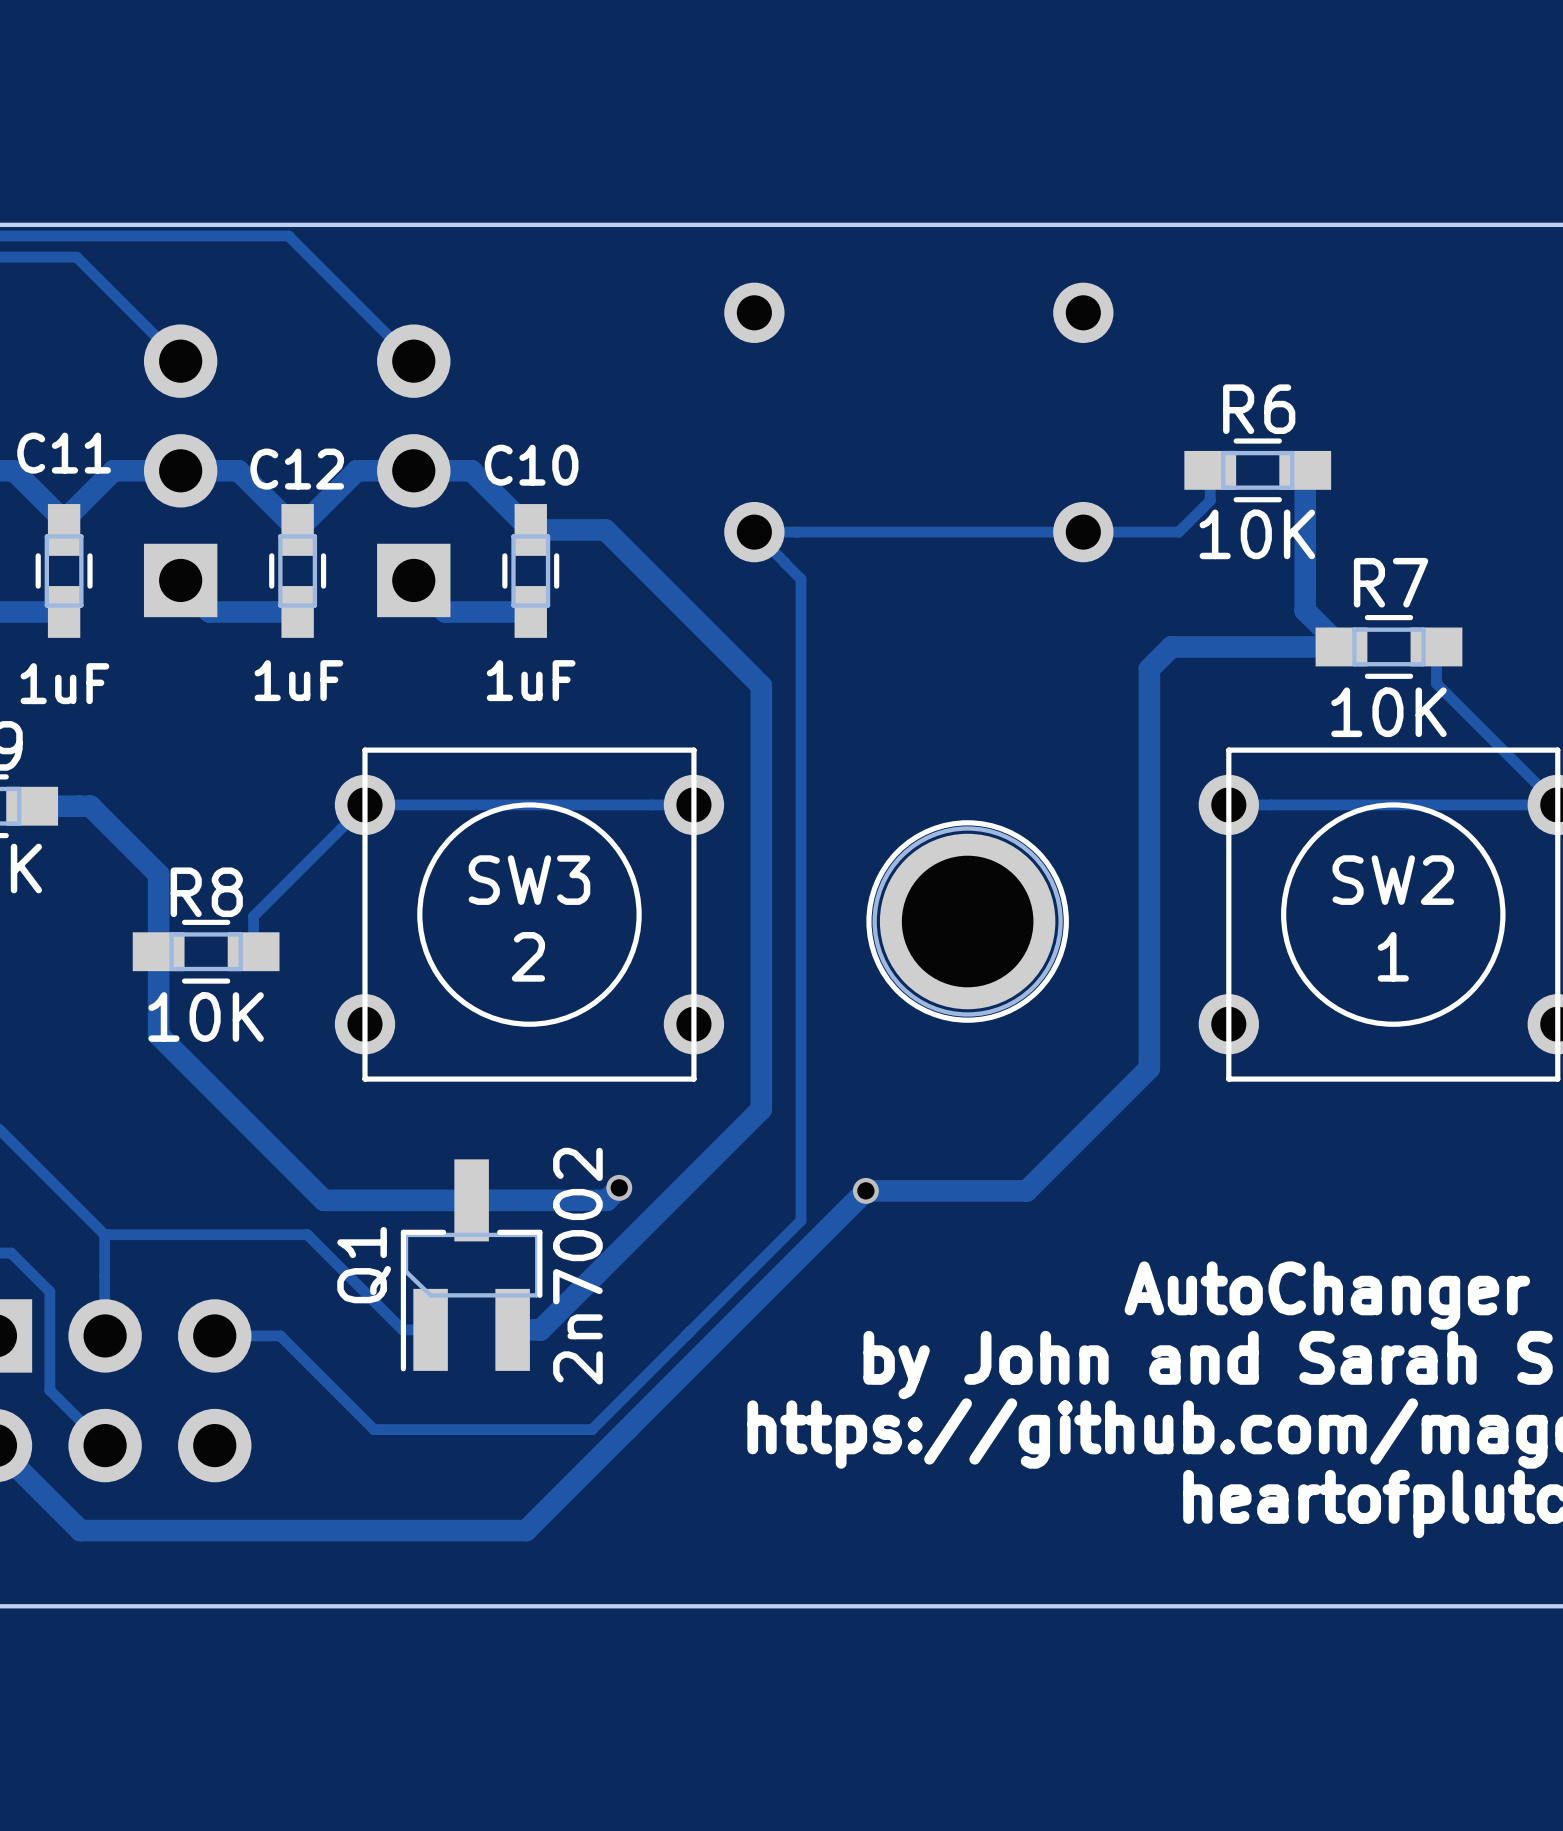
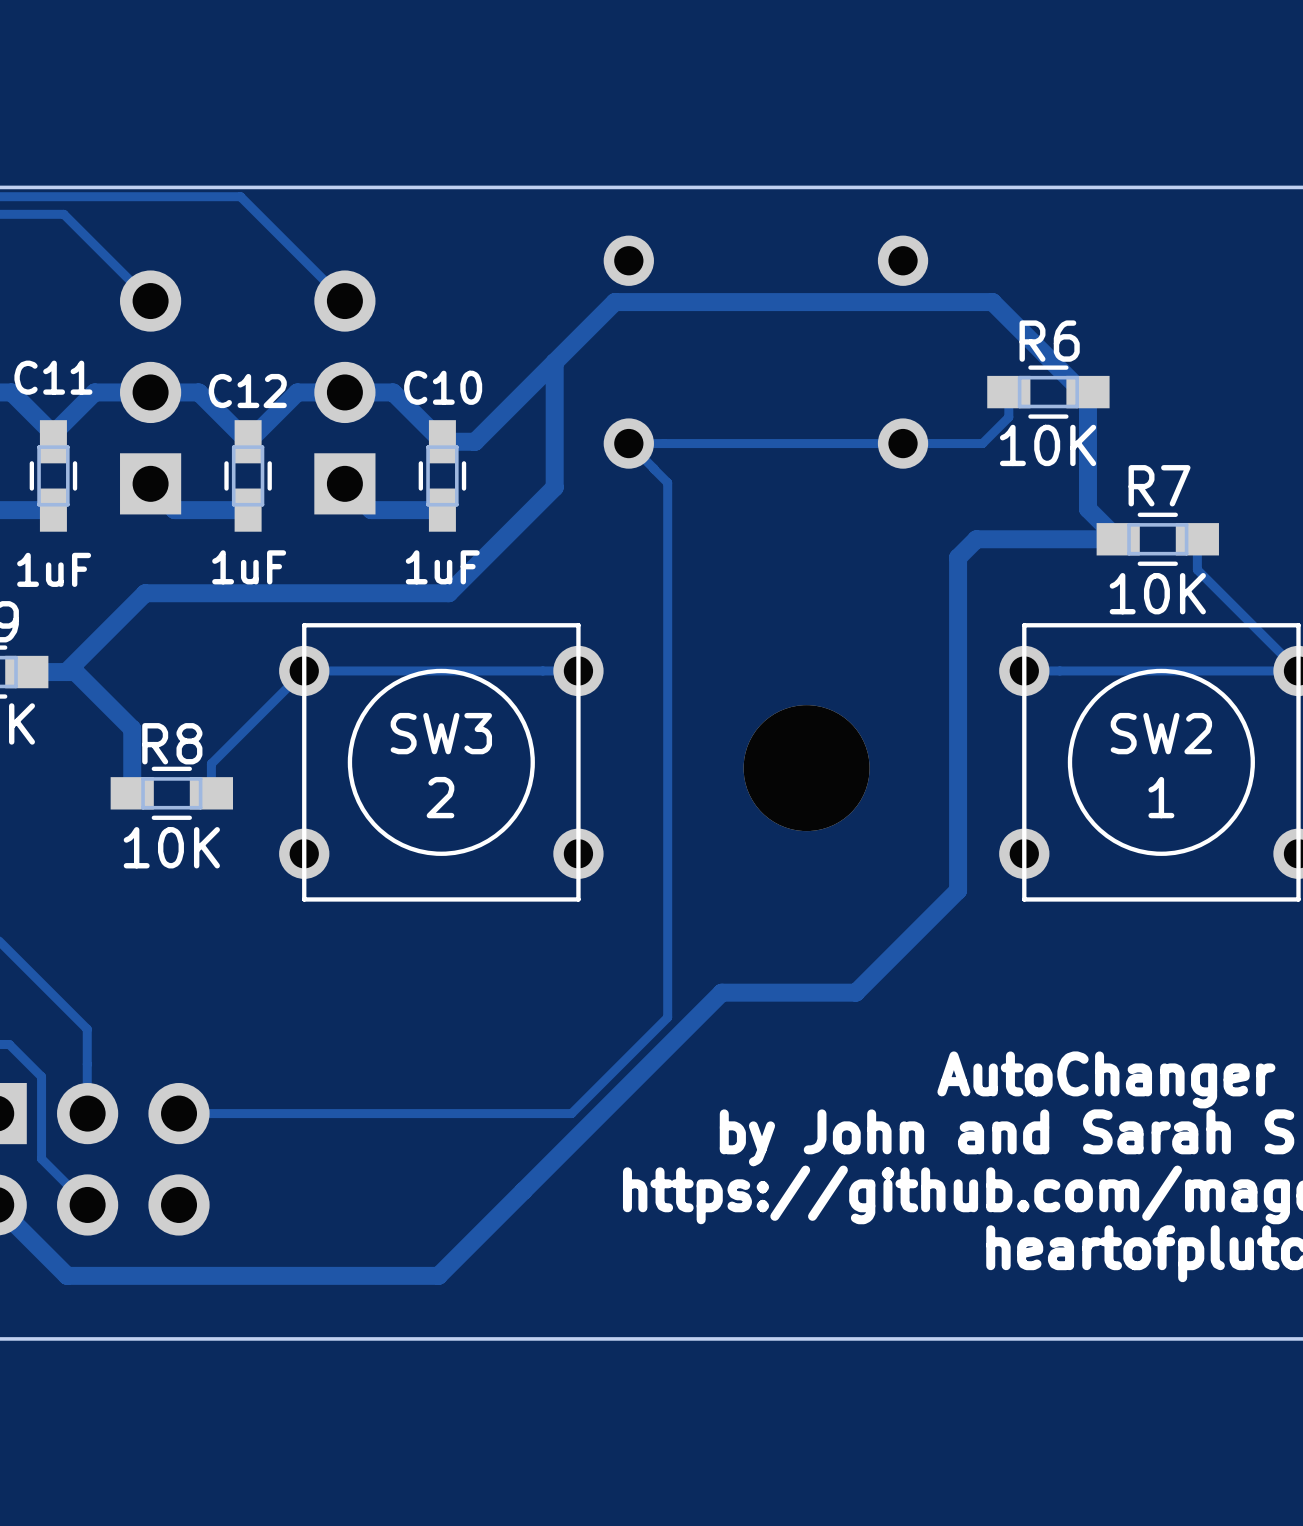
track: none -> (554, 362) (554, 487) (448, 593) (145, 593) (66, 672)
track: (570, 529) (605, 529) (761, 685) (761, 1109) (540, 1329) (512, 1329) -> (475, 441) (614, 302) (992, 302) (1082, 392)
part footprint: [866, 820, 1069, 1023] -> [743, 705, 870, 832]
track: (158, 951) (158, 1035) (323, 1200) (606, 1200) (619, 1187) -> none
via: (619, 1187) -> none
via: (865, 1190) -> none
track: (104, 1234) (307, 1234) (402, 1329) (430, 1329) -> none
Q1: 2n7002 (471, 1265) -> none
track: (280, 1335) (374, 1429) (592, 1429) (685, 1335) -> (233, 1113) (571, 1113)

